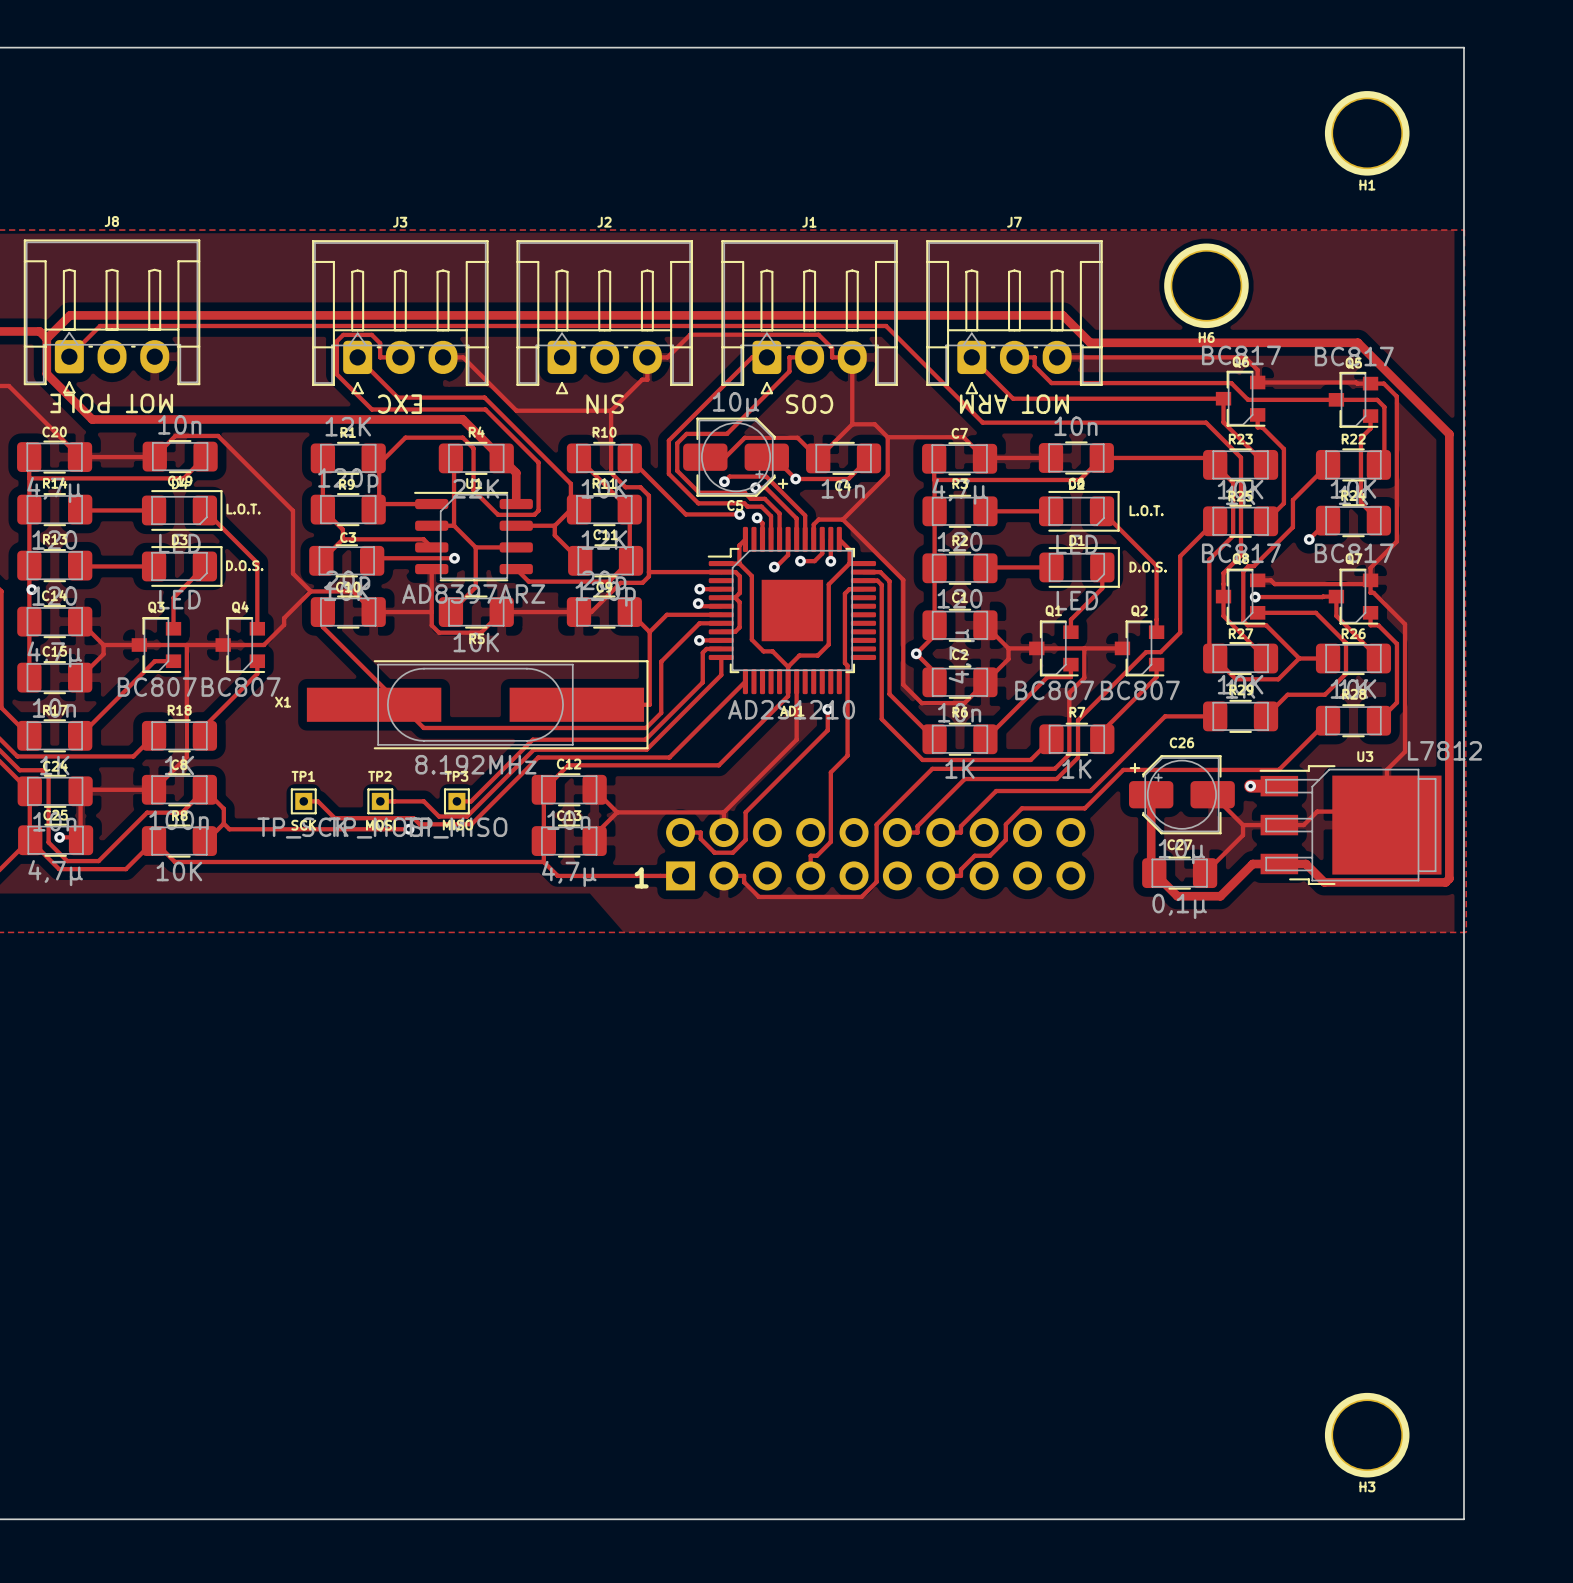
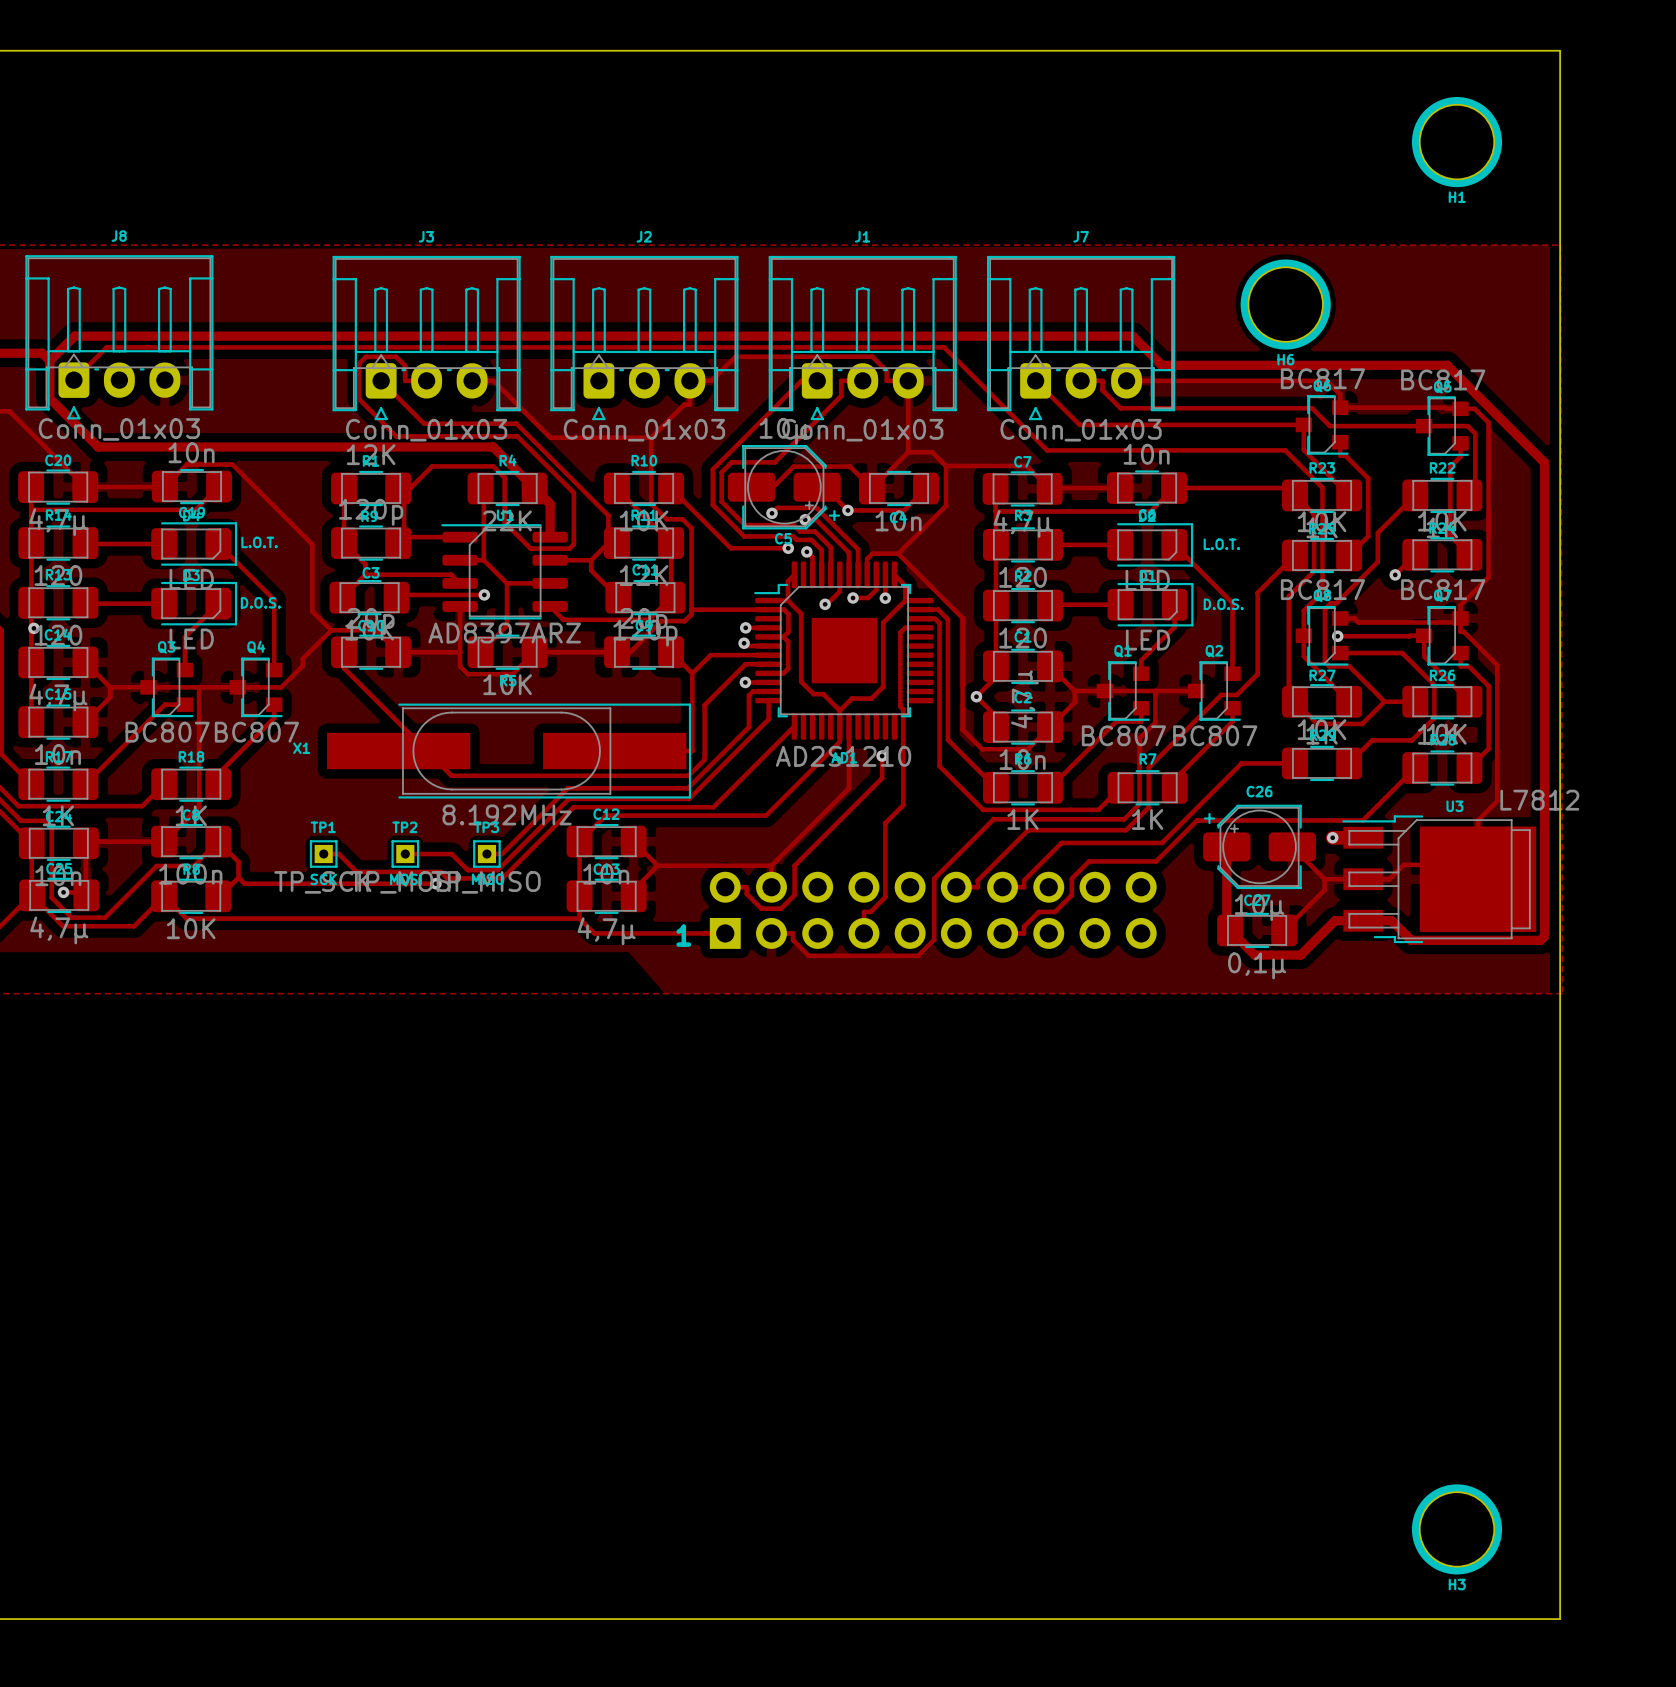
J8 value: MOT POLE (111, 403) -> Conn_01x03 (119, 429)
J3 value: EXC (399, 404) -> Conn_01x03 (426, 430)
J2 value: SIN (605, 404) -> Conn_01x03 (644, 430)
J1 value: COS (809, 404) -> Conn_01x03 (862, 430)
J7 value: MOT ARM (1014, 404) -> Conn_01x03 (1081, 430)

